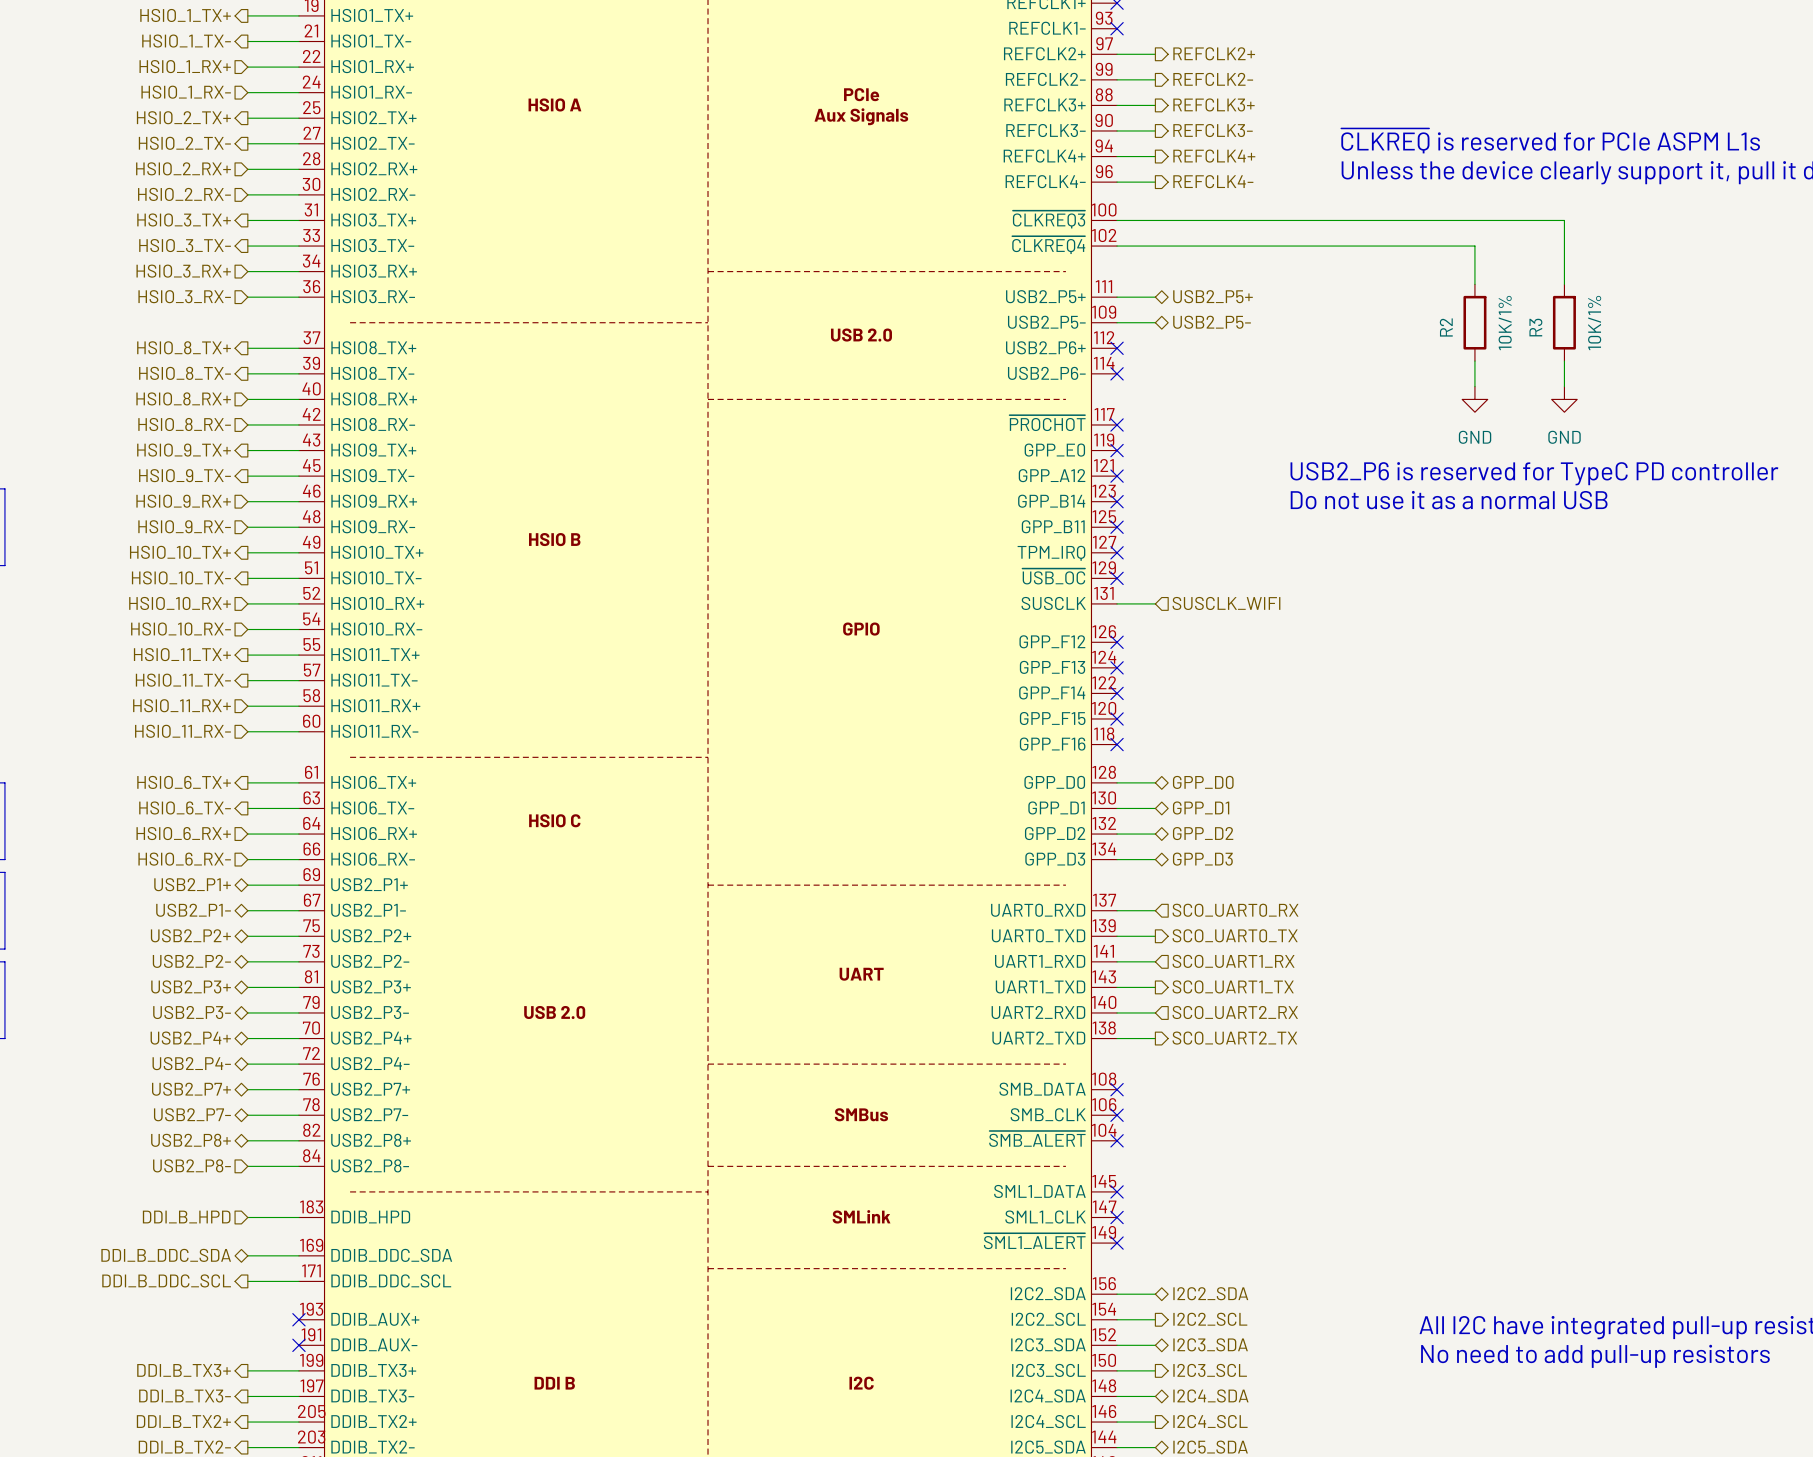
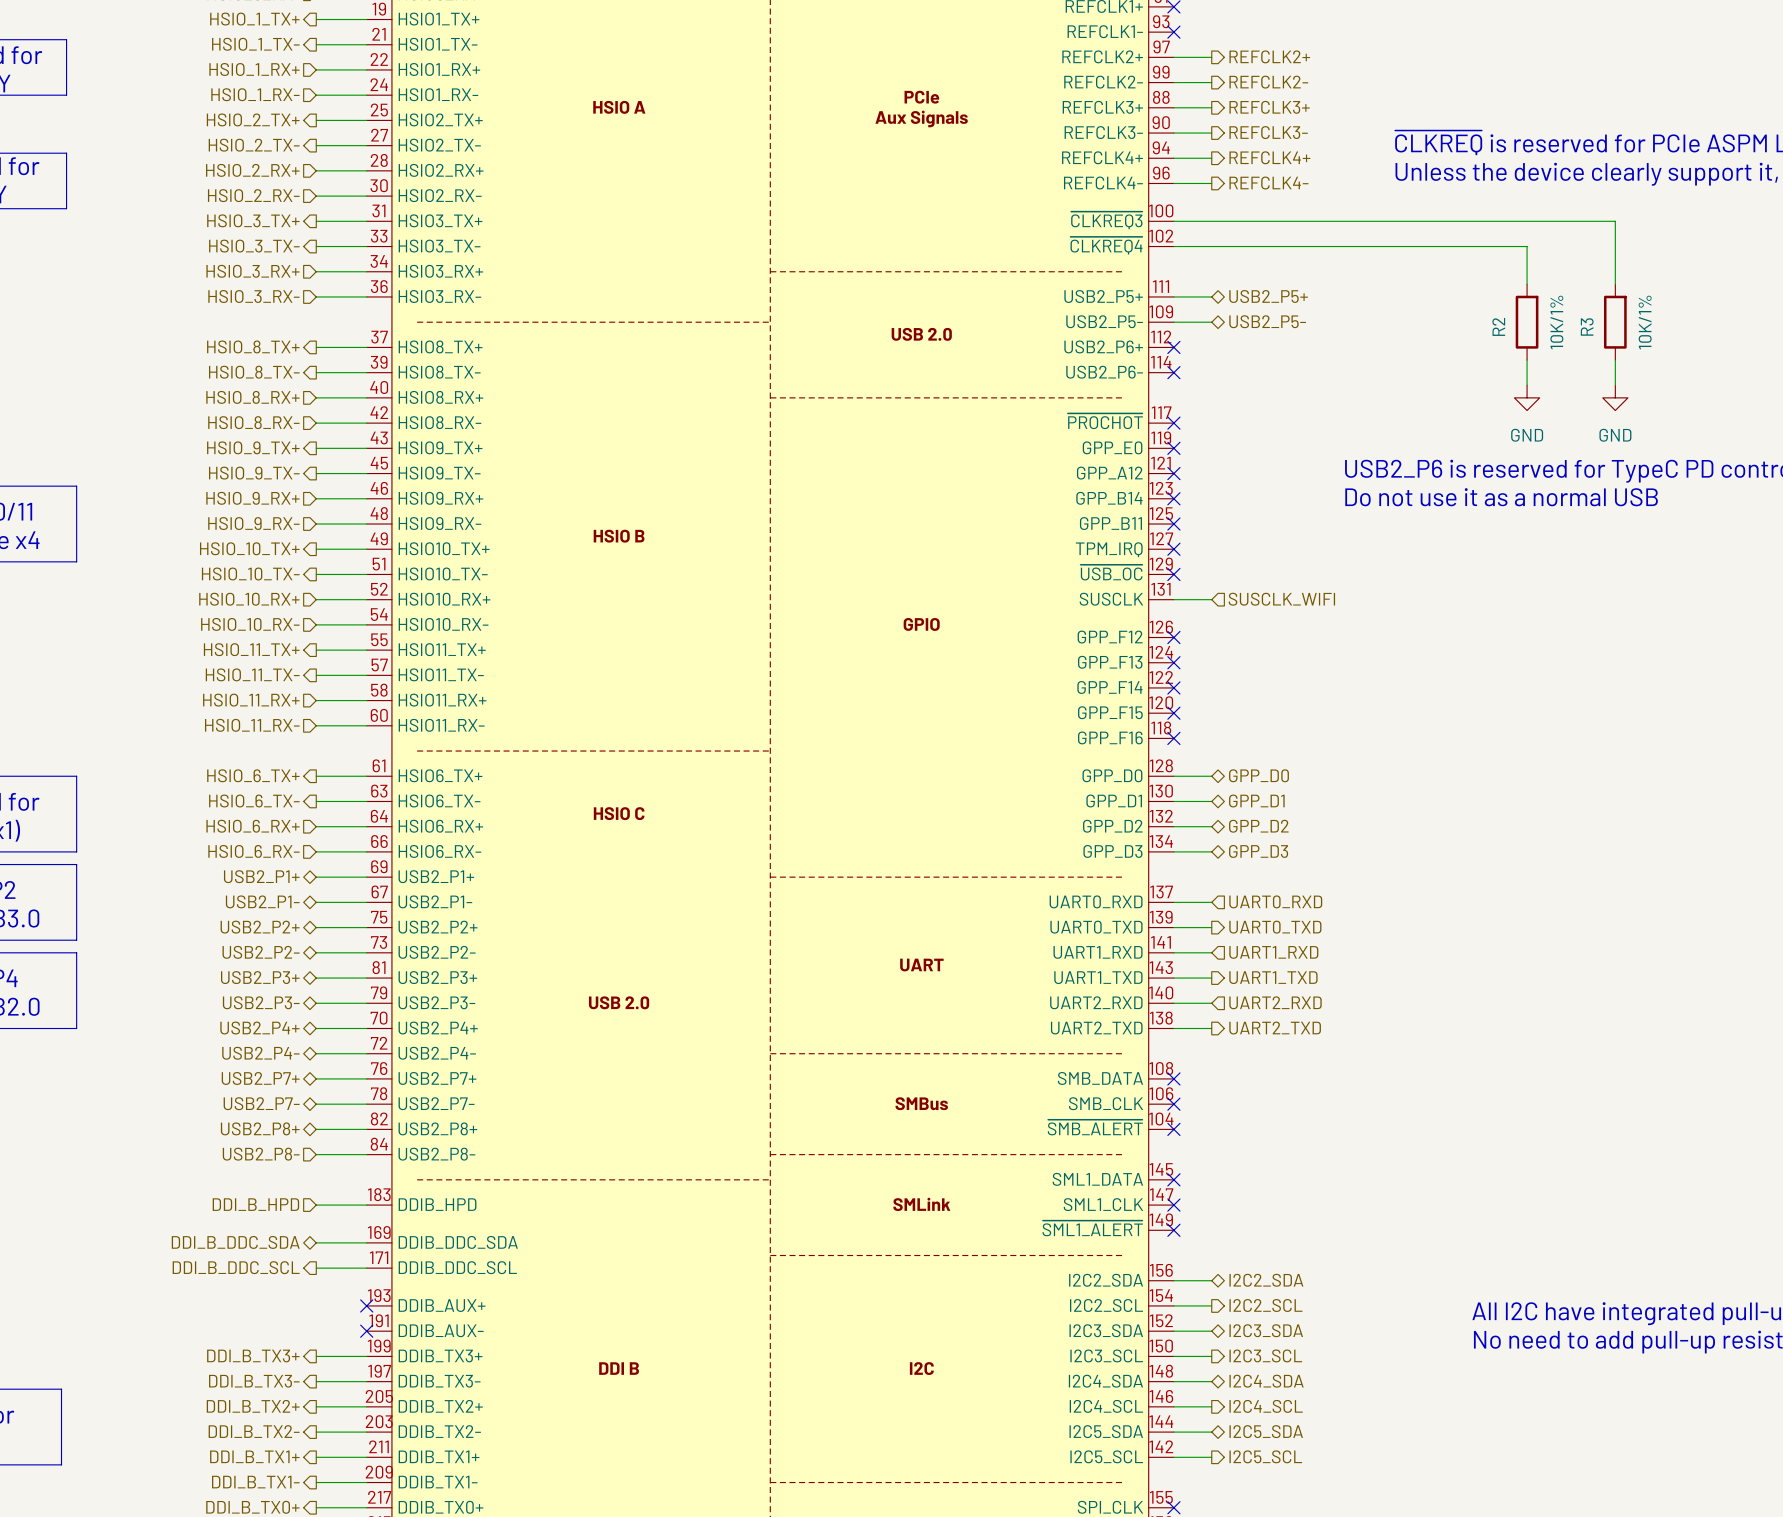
hierarchical label: SCO_UART0_RX (1235, 910) -> UART0_RXD (1275, 901)
hierarchical label: SCO_UART0_TX (1235, 935) -> UART0_TXD (1275, 927)
hierarchical label: SCO_UART1_RX (1233, 961) -> UART1_RXD (1273, 952)
hierarchical label: SCO_UART1_TX (1233, 986) -> UART1_TXD (1273, 977)
hierarchical label: SCO_UART2_RX (1235, 1012) -> UART2_RXD (1275, 1002)
hierarchical label: SCO_UART2_TX (1234, 1038) -> UART2_TXD (1275, 1028)

